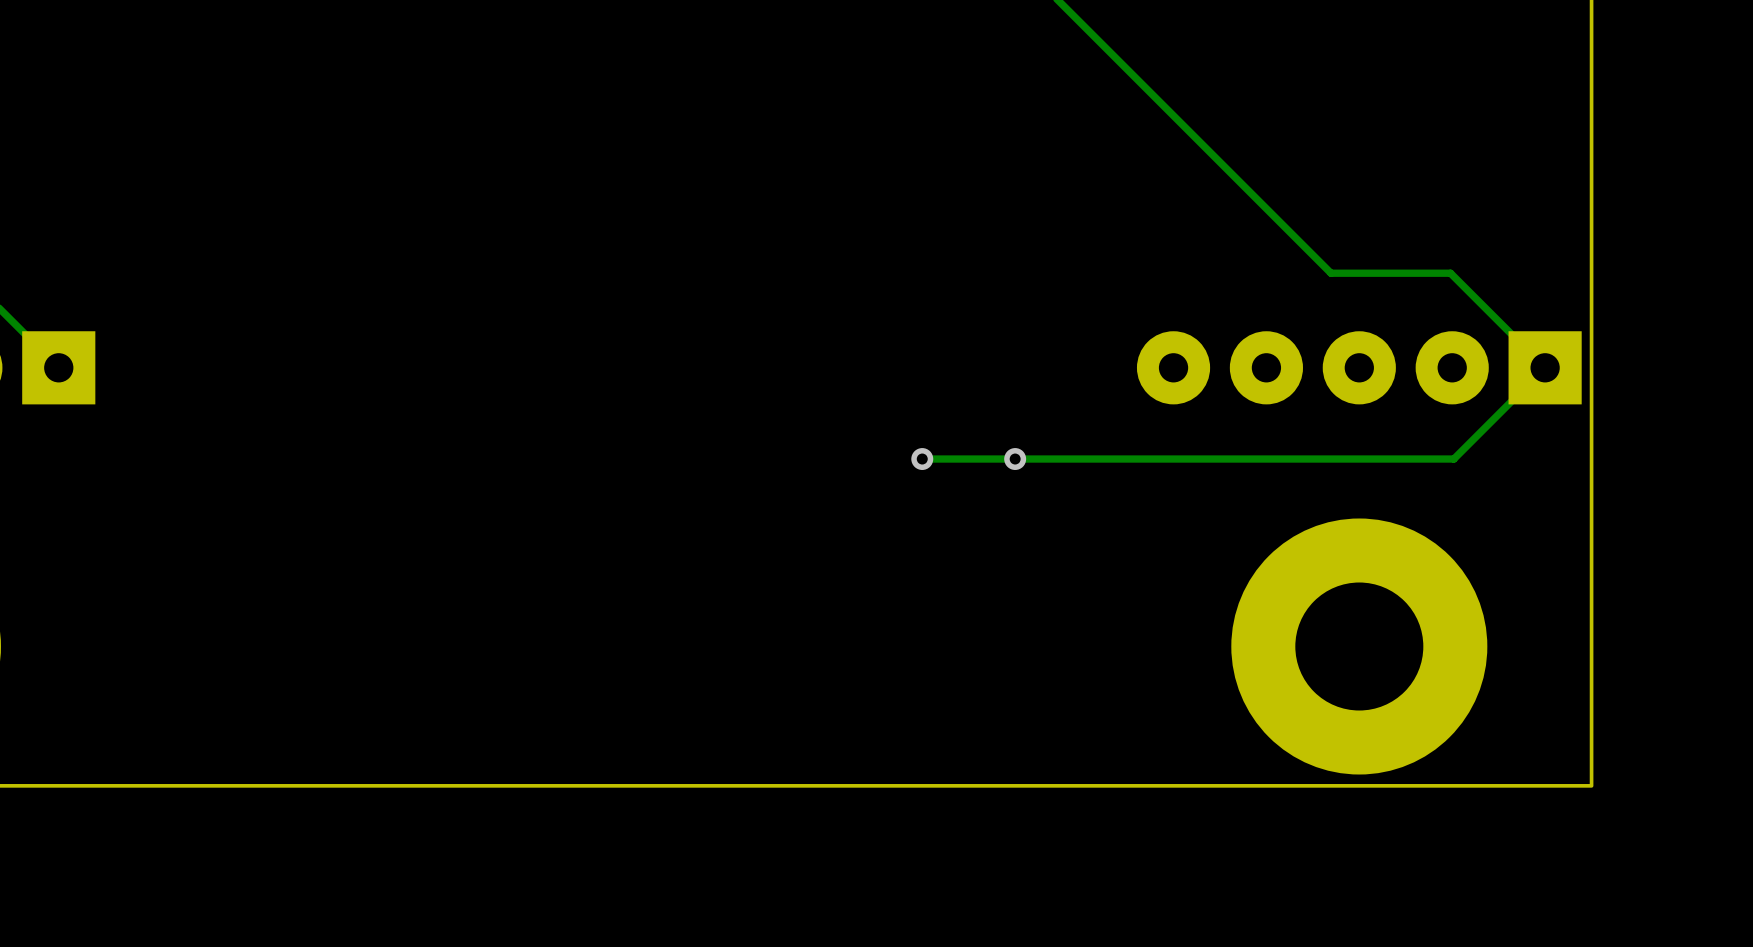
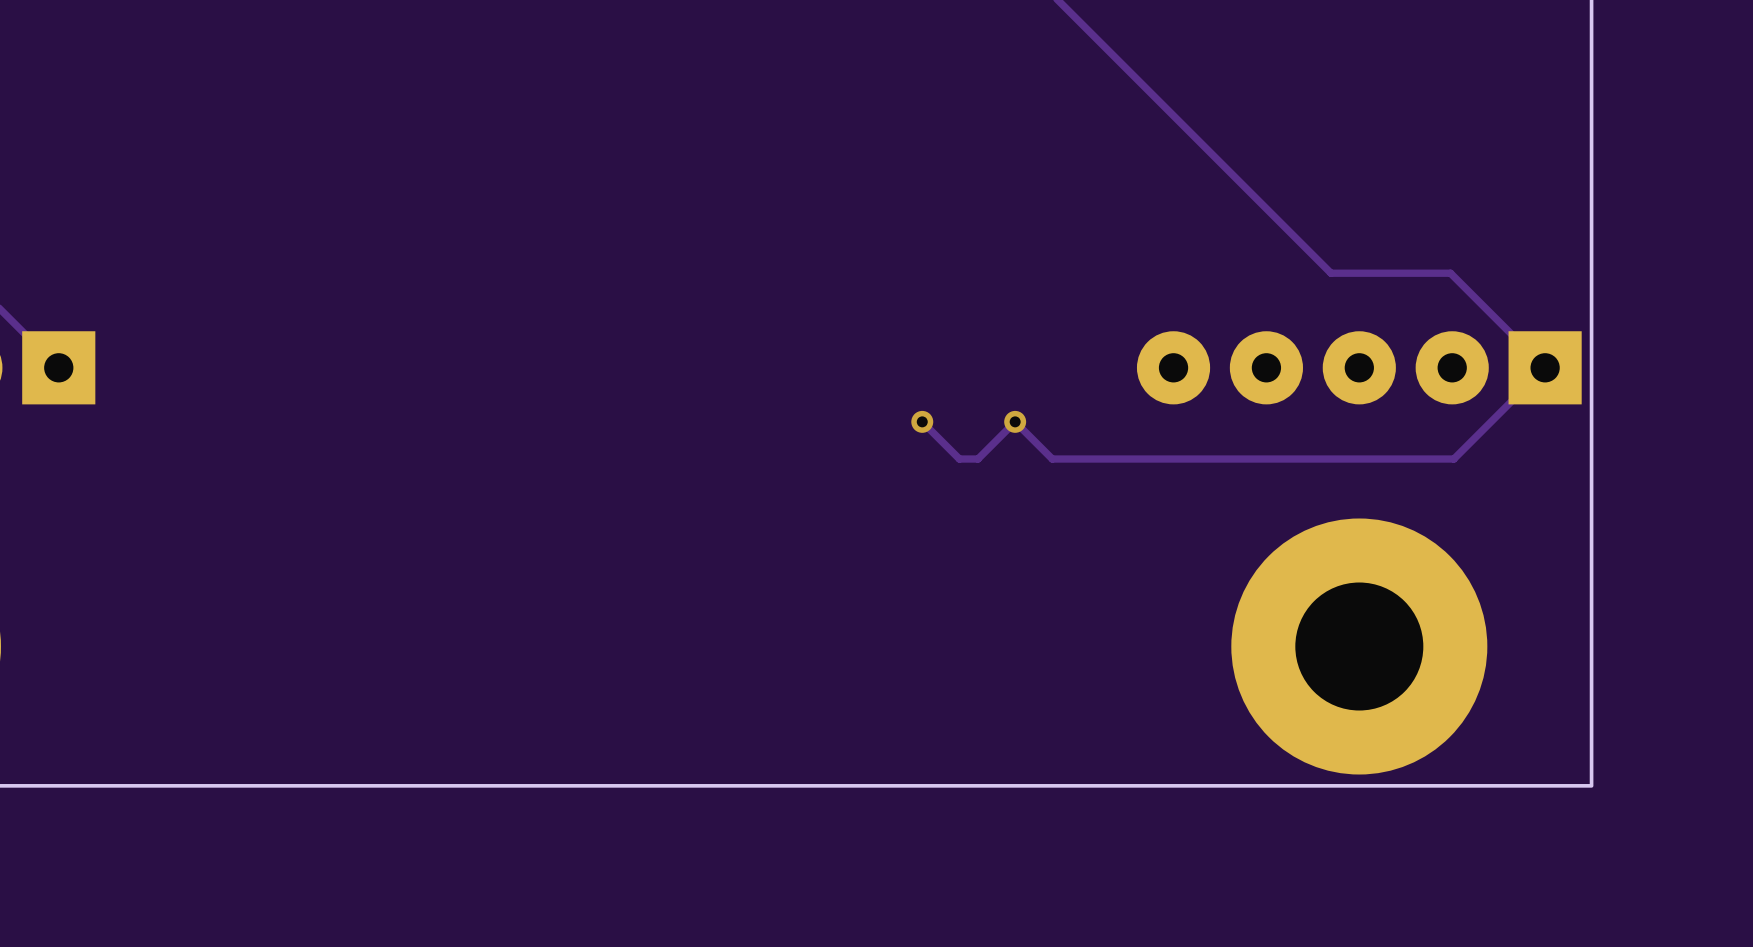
via position: (922, 459) -> (922, 421)
track: (959, 459) (922, 459) -> (959, 459) (922, 421)
via position: (1015, 459) -> (1015, 421)
track: (1052, 459) (978, 459) -> (1052, 459) (1015, 421) (978, 459)

